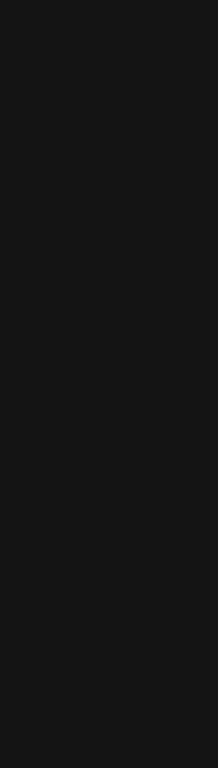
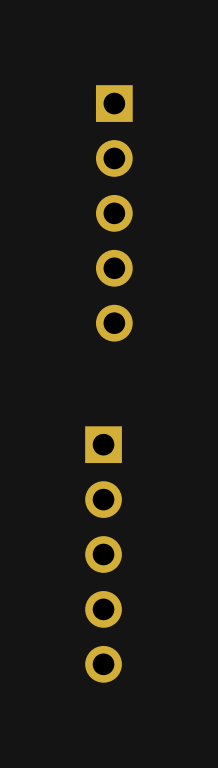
part: none -> (114, 213)
part: none -> (103, 554)

